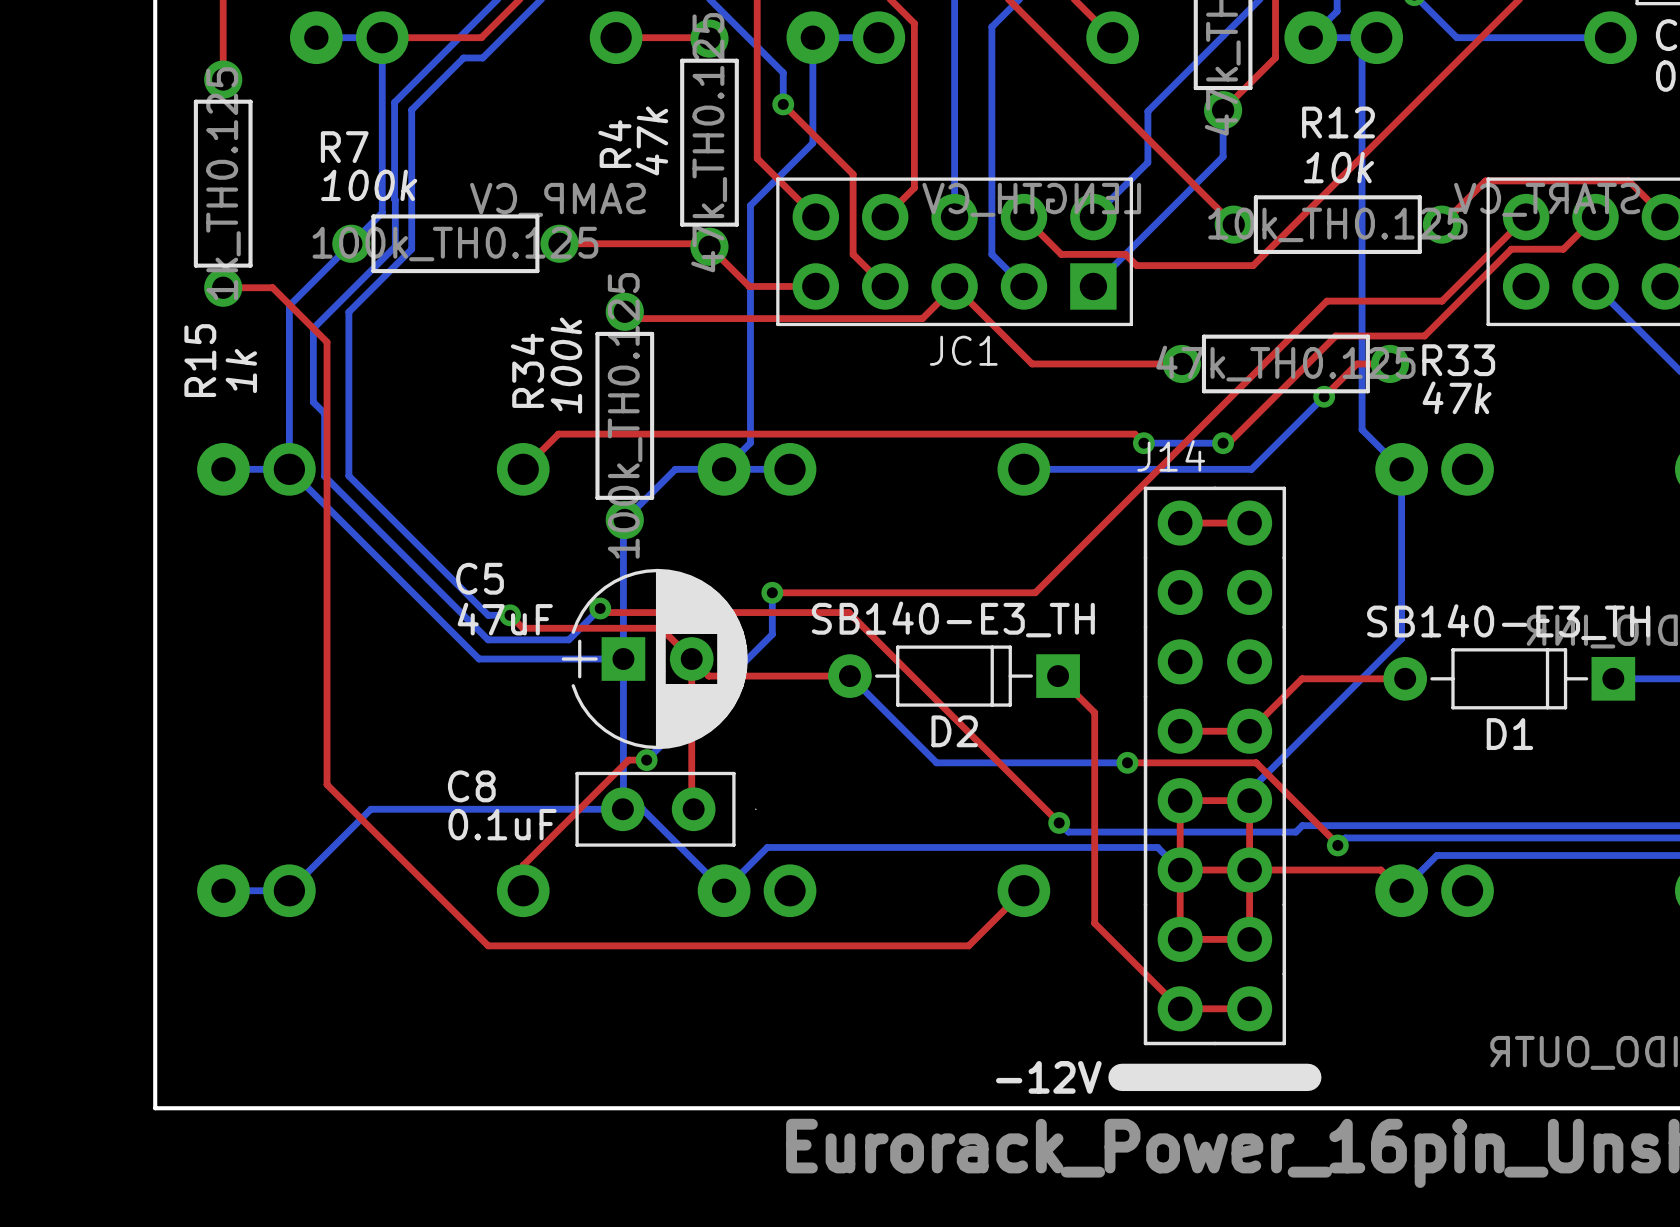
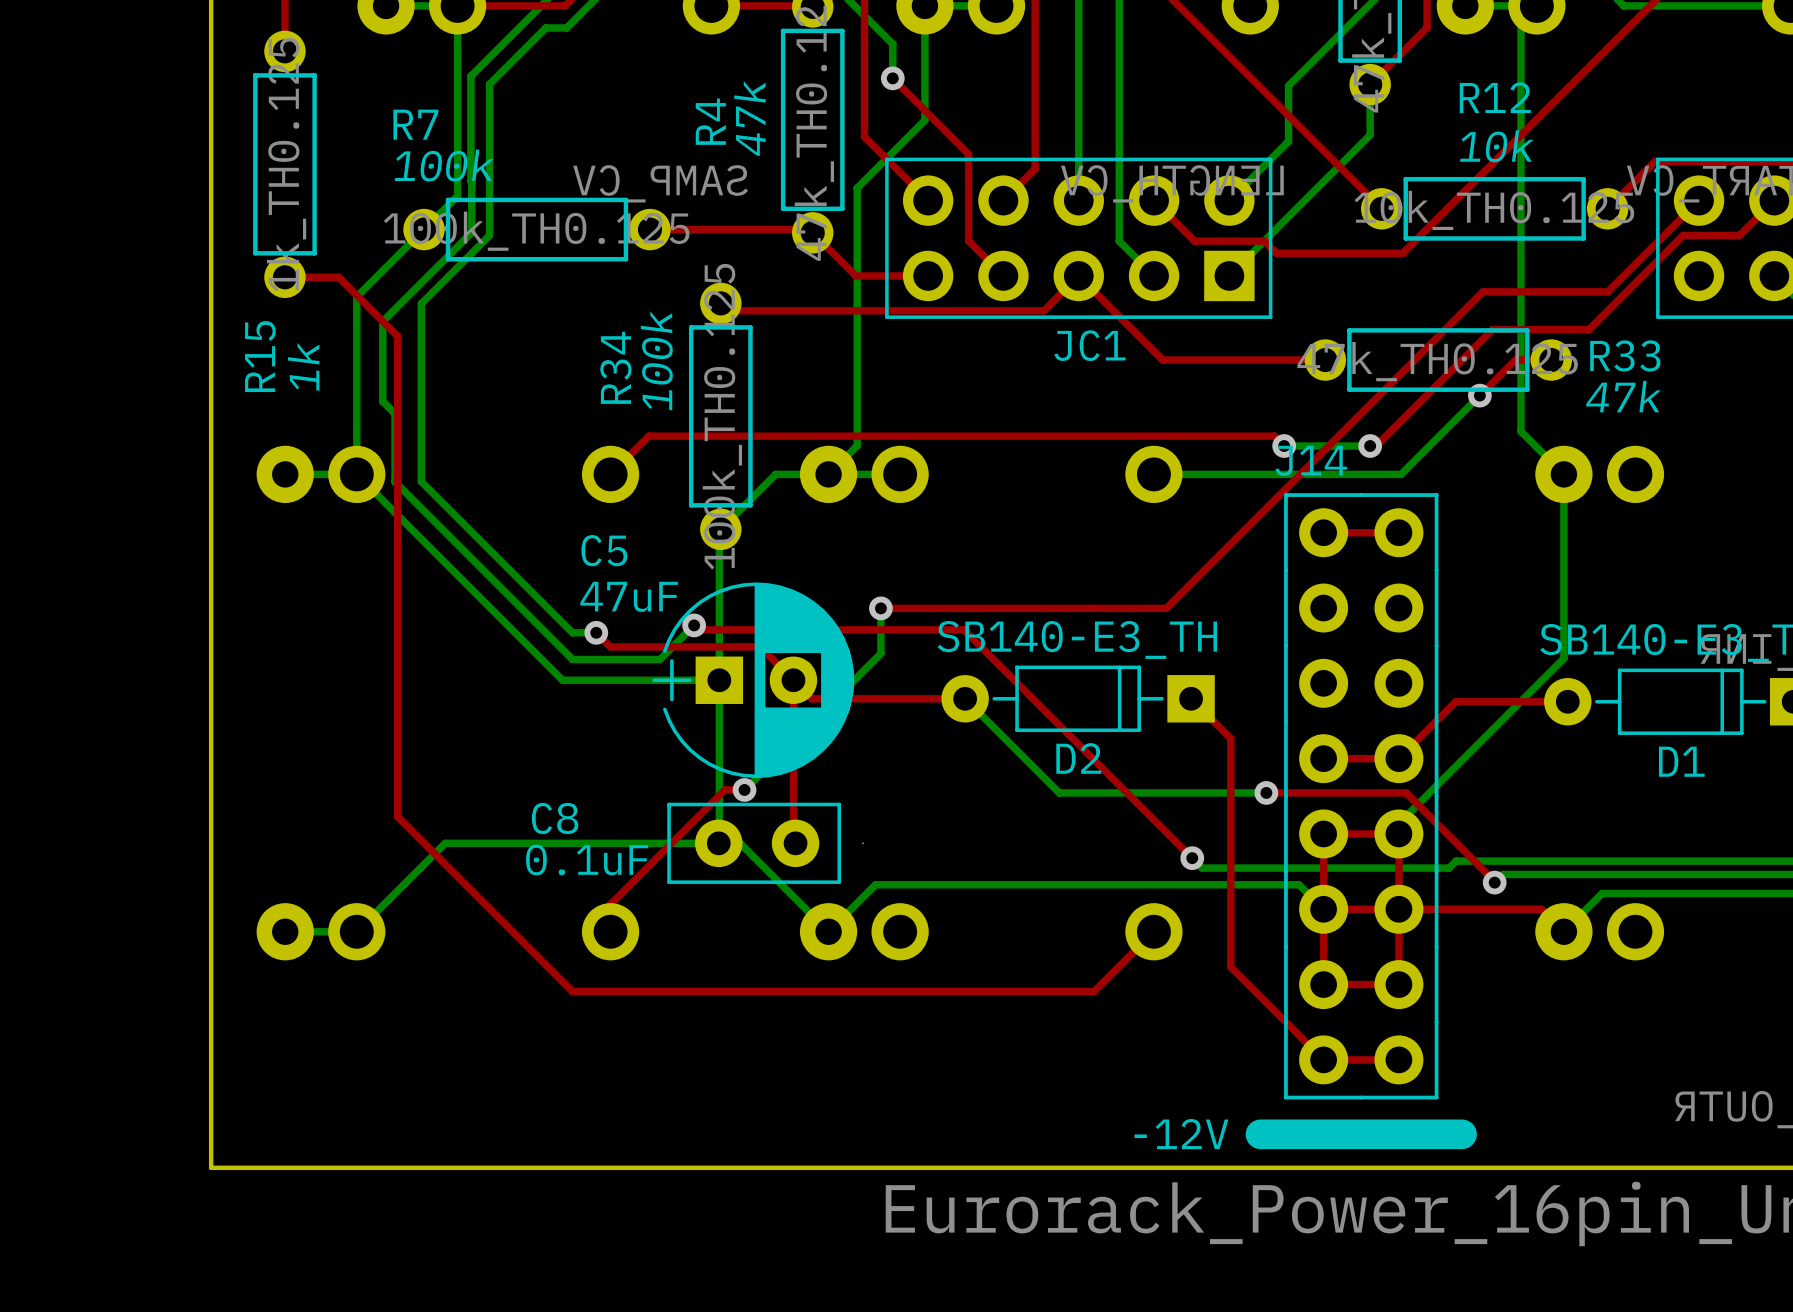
C5 name position: C5 (480, 578) -> C5 (604, 550)
C5 text position: 47uF (505, 619) -> 47uF (629, 596)

